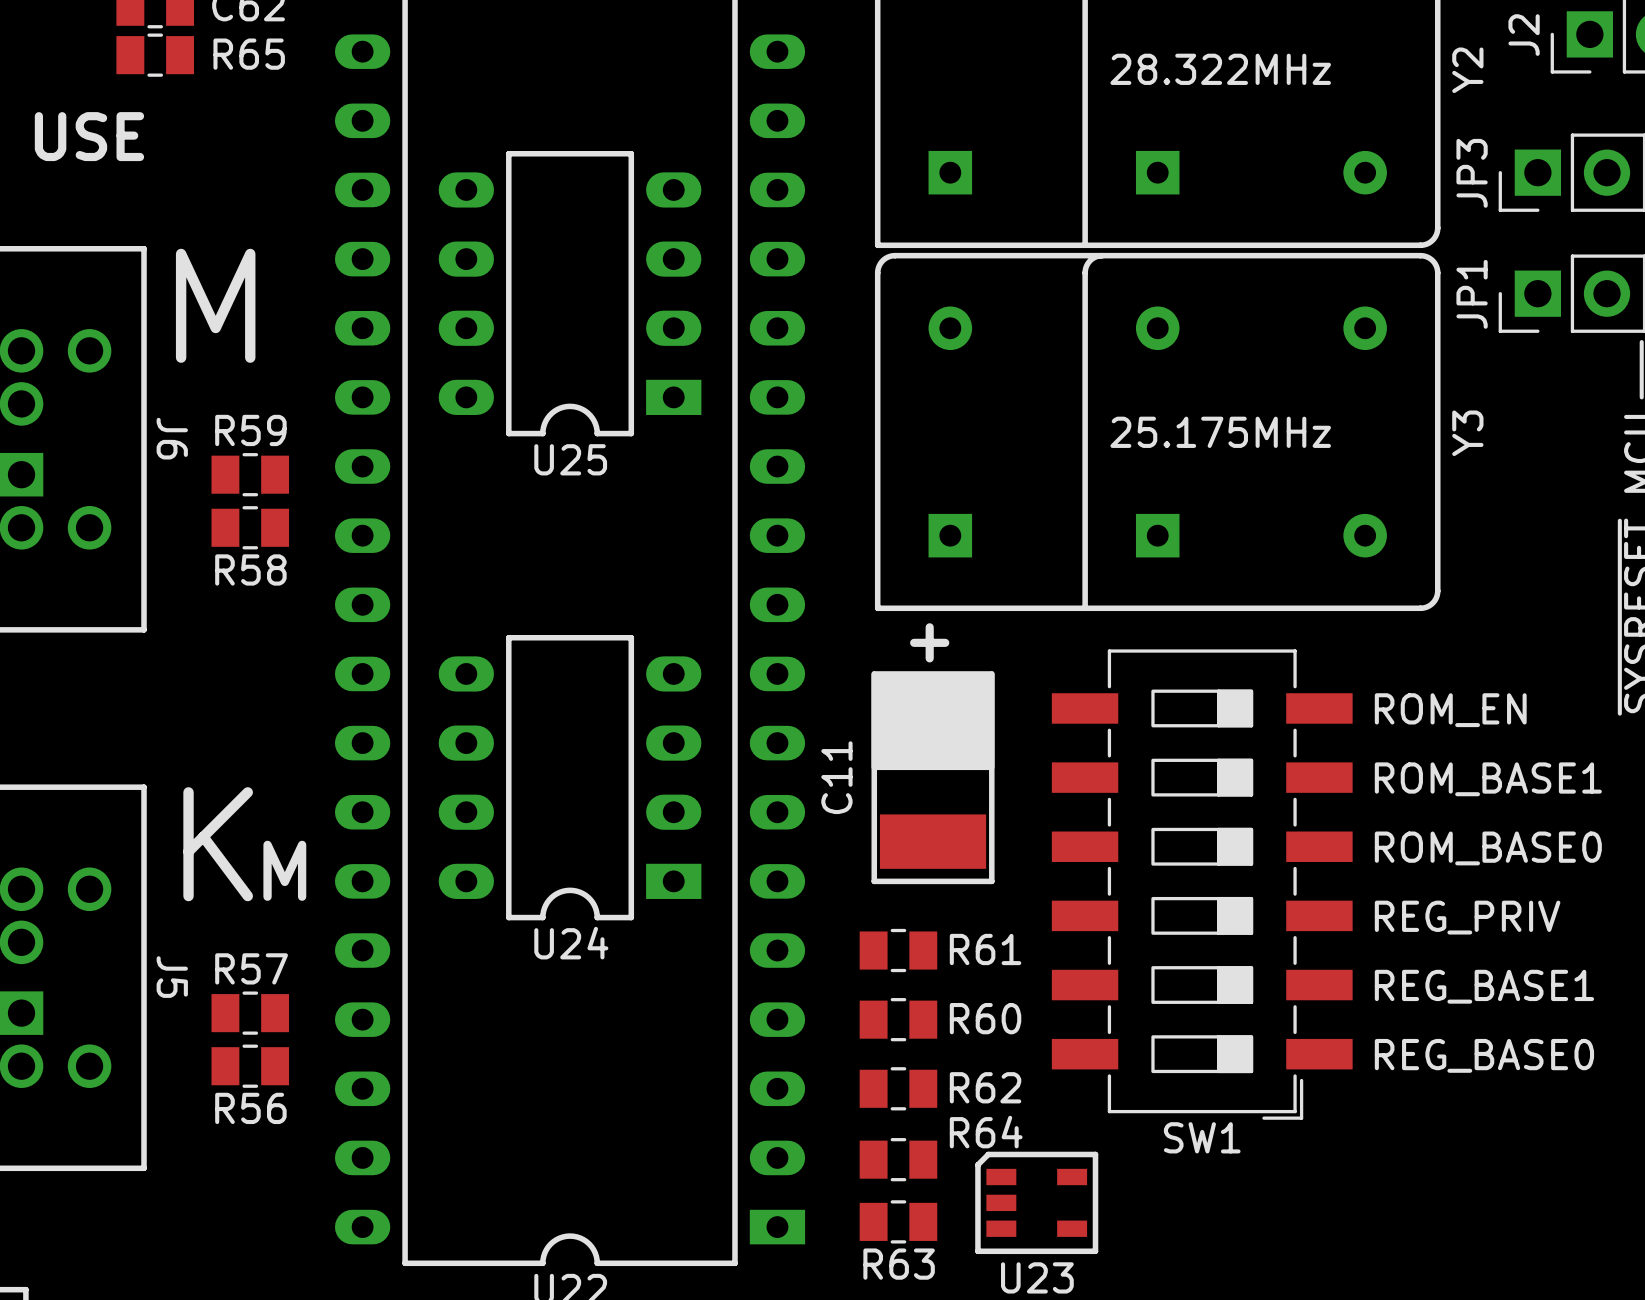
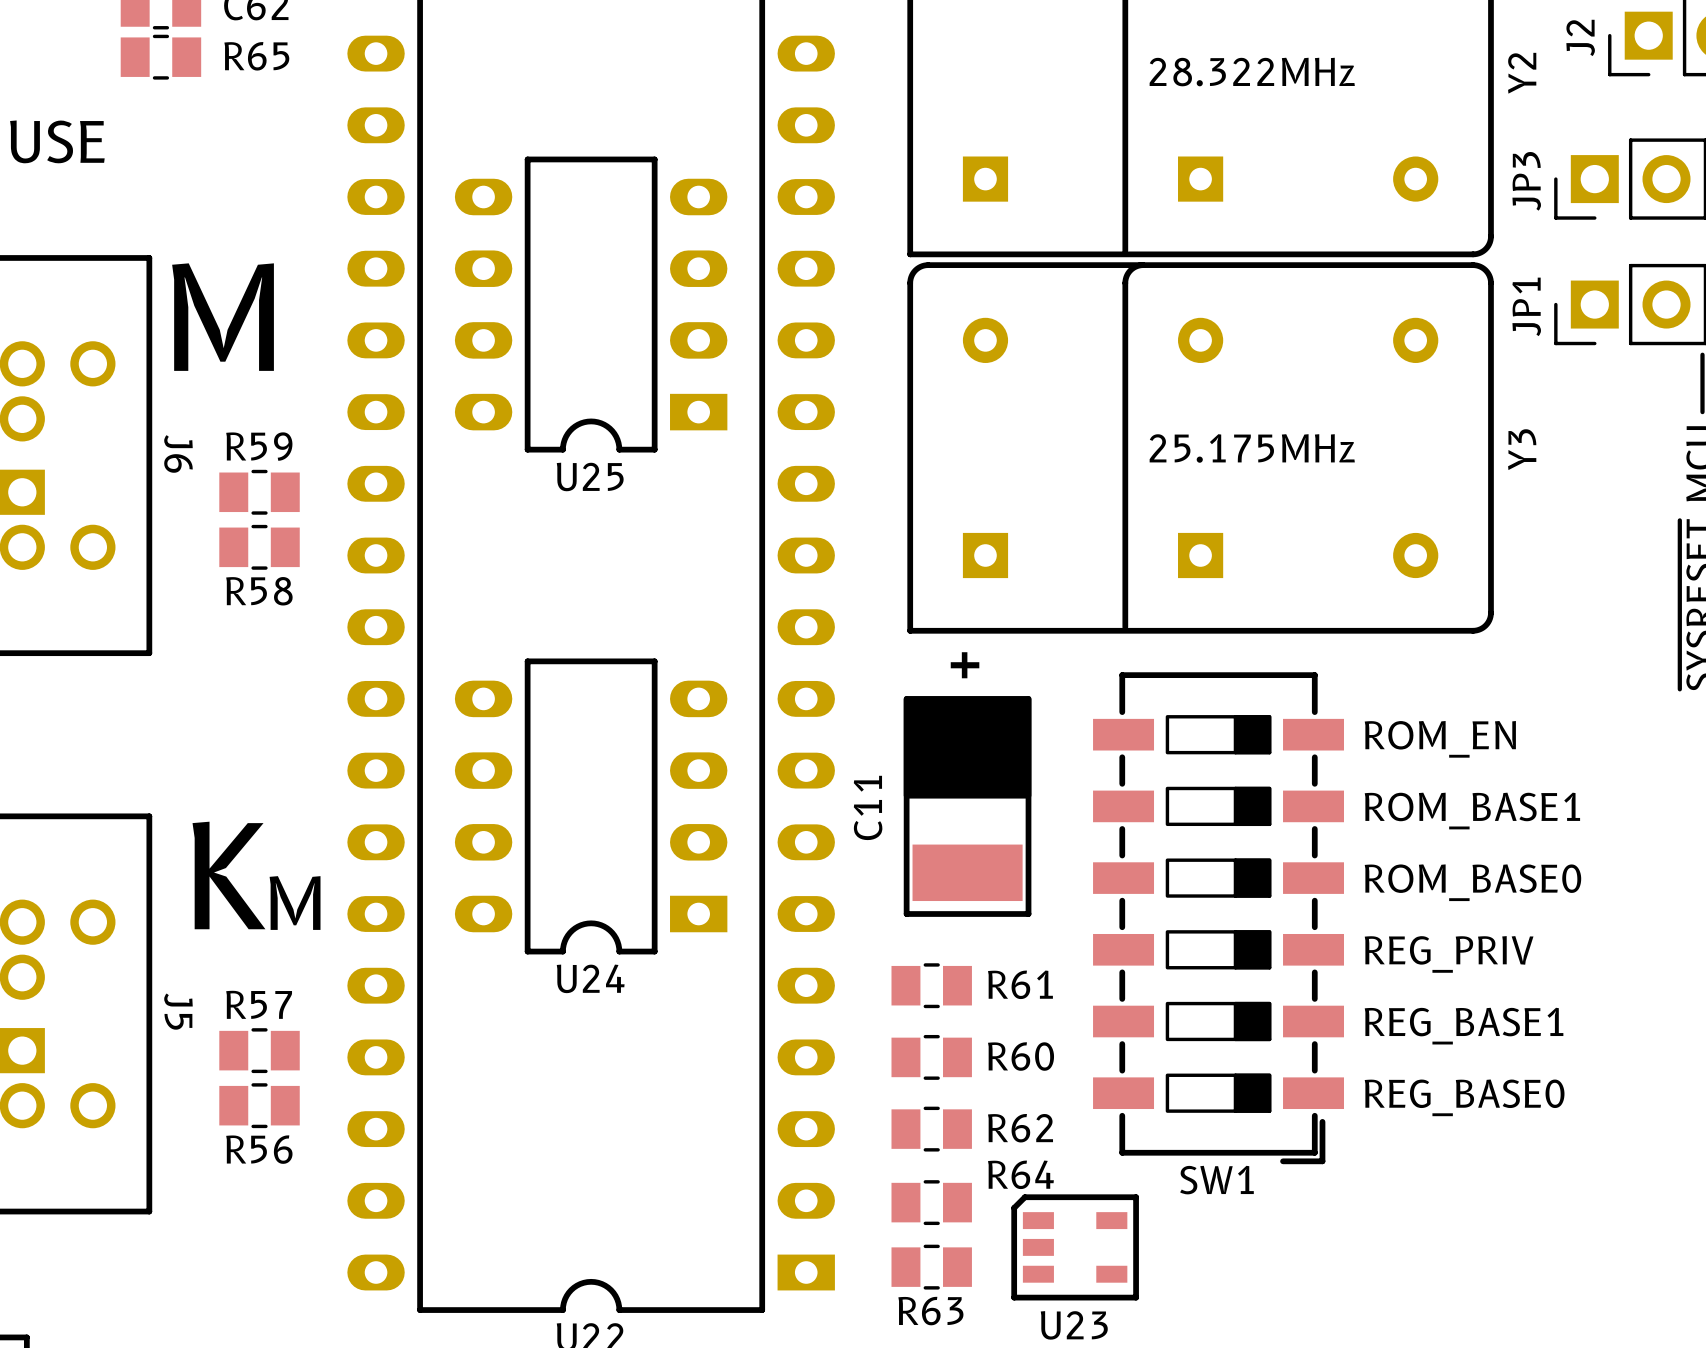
SW1 footprint: [1051, 649, 1353, 1120] -> [1093, 672, 1344, 1165]
text position: ROM_EN (1450, 710) -> ROM_EN (1440, 739)
text position: ROM_BASE1 (1488, 779) -> ROM_BASE1 (1472, 811)
text position: ROM_BASE0 (1488, 848) -> ROM_BASE0 (1472, 882)
text position: REG_PRIV (1467, 917) -> REG_PRIV (1449, 954)
text position: REG_BASE1 (1484, 986) -> REG_BASE1 (1464, 1026)
text position: REG_BASE0 (1484, 1055) -> REG_BASE0 (1464, 1097)

